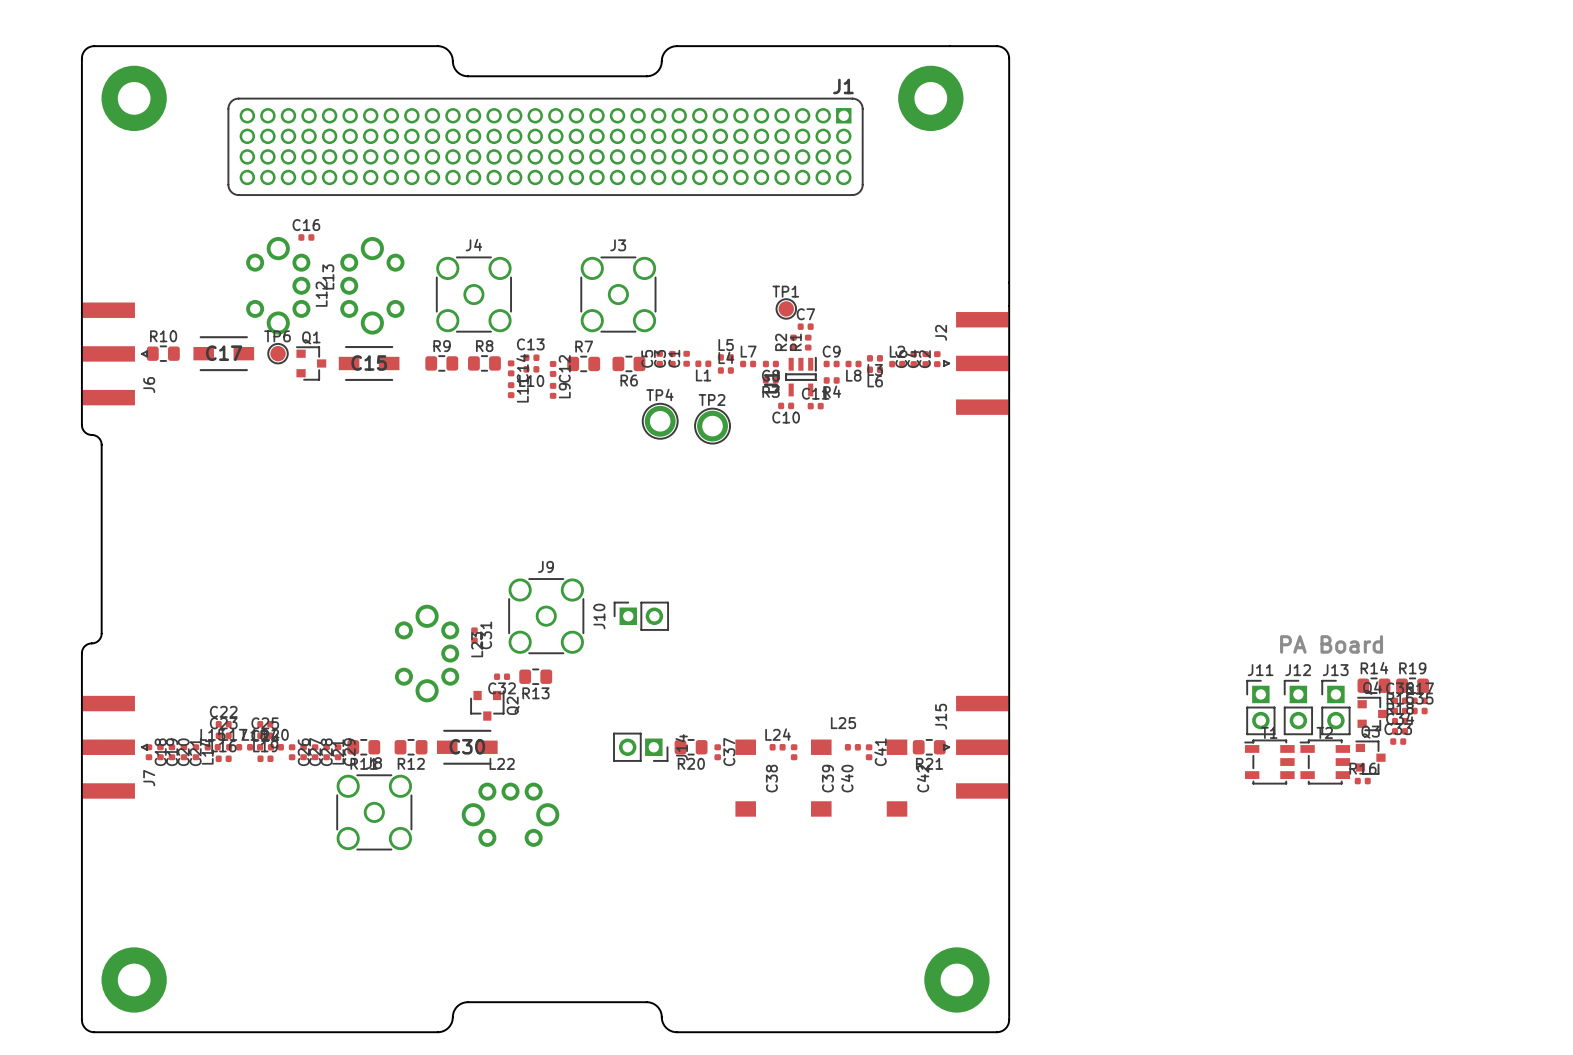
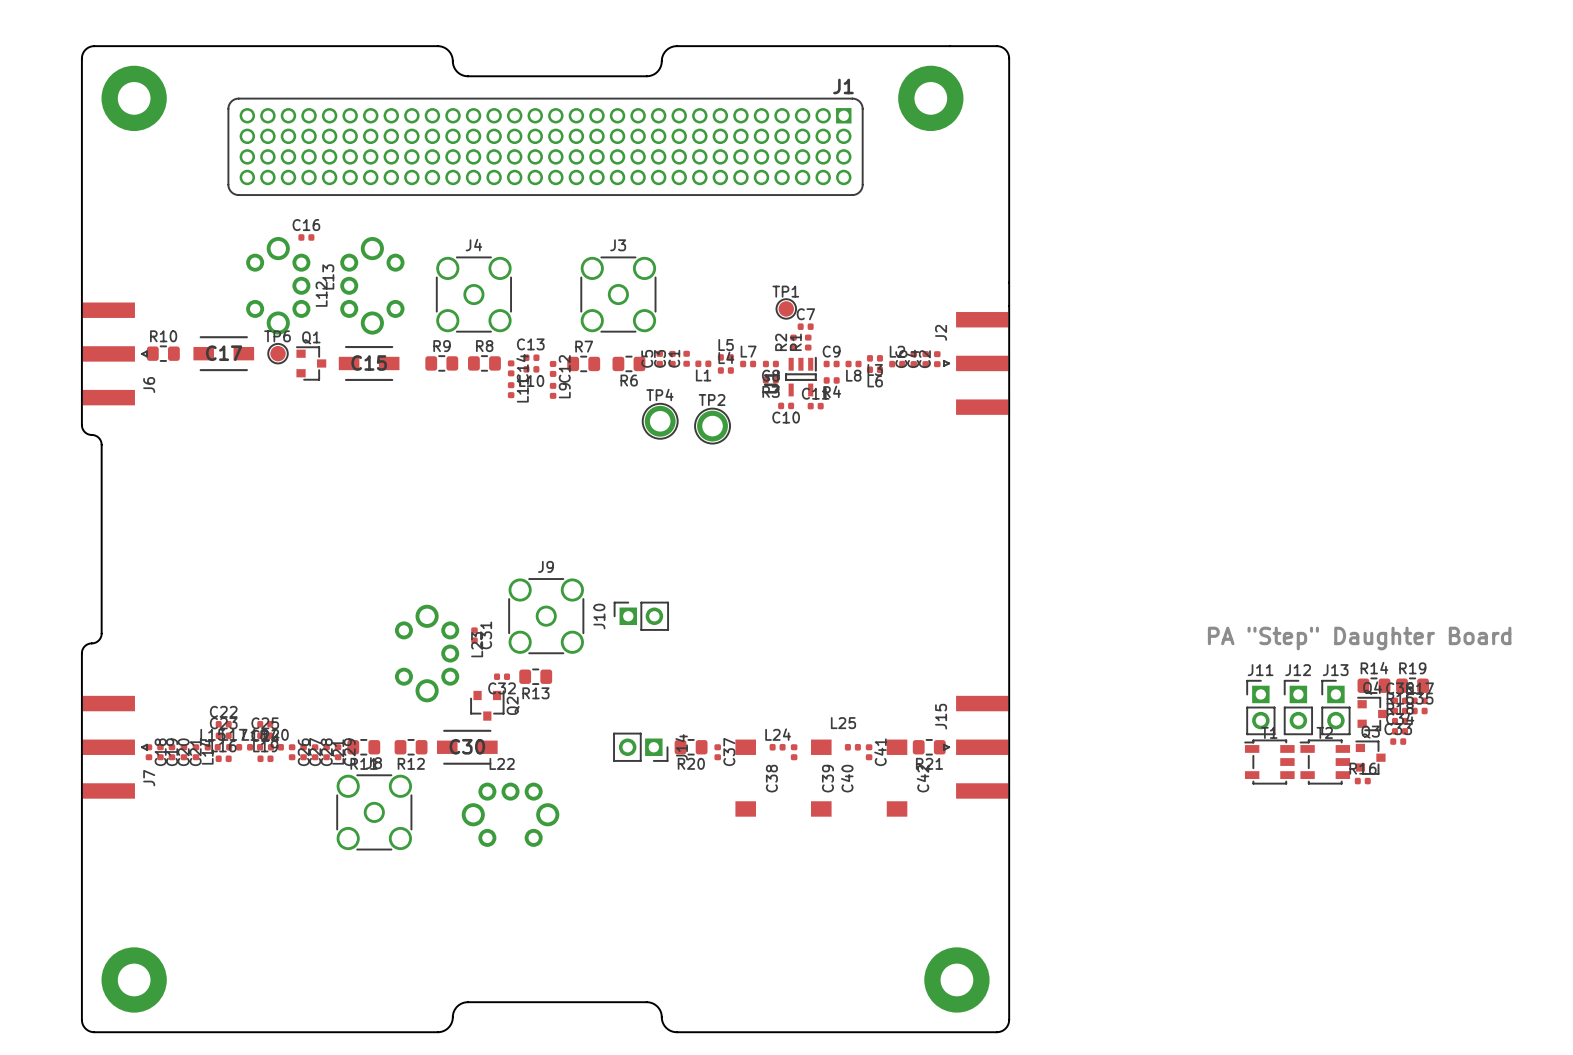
text: none -> PA "Step" Daughter Board (1359, 638)
text: PA Board (1331, 644) -> none

